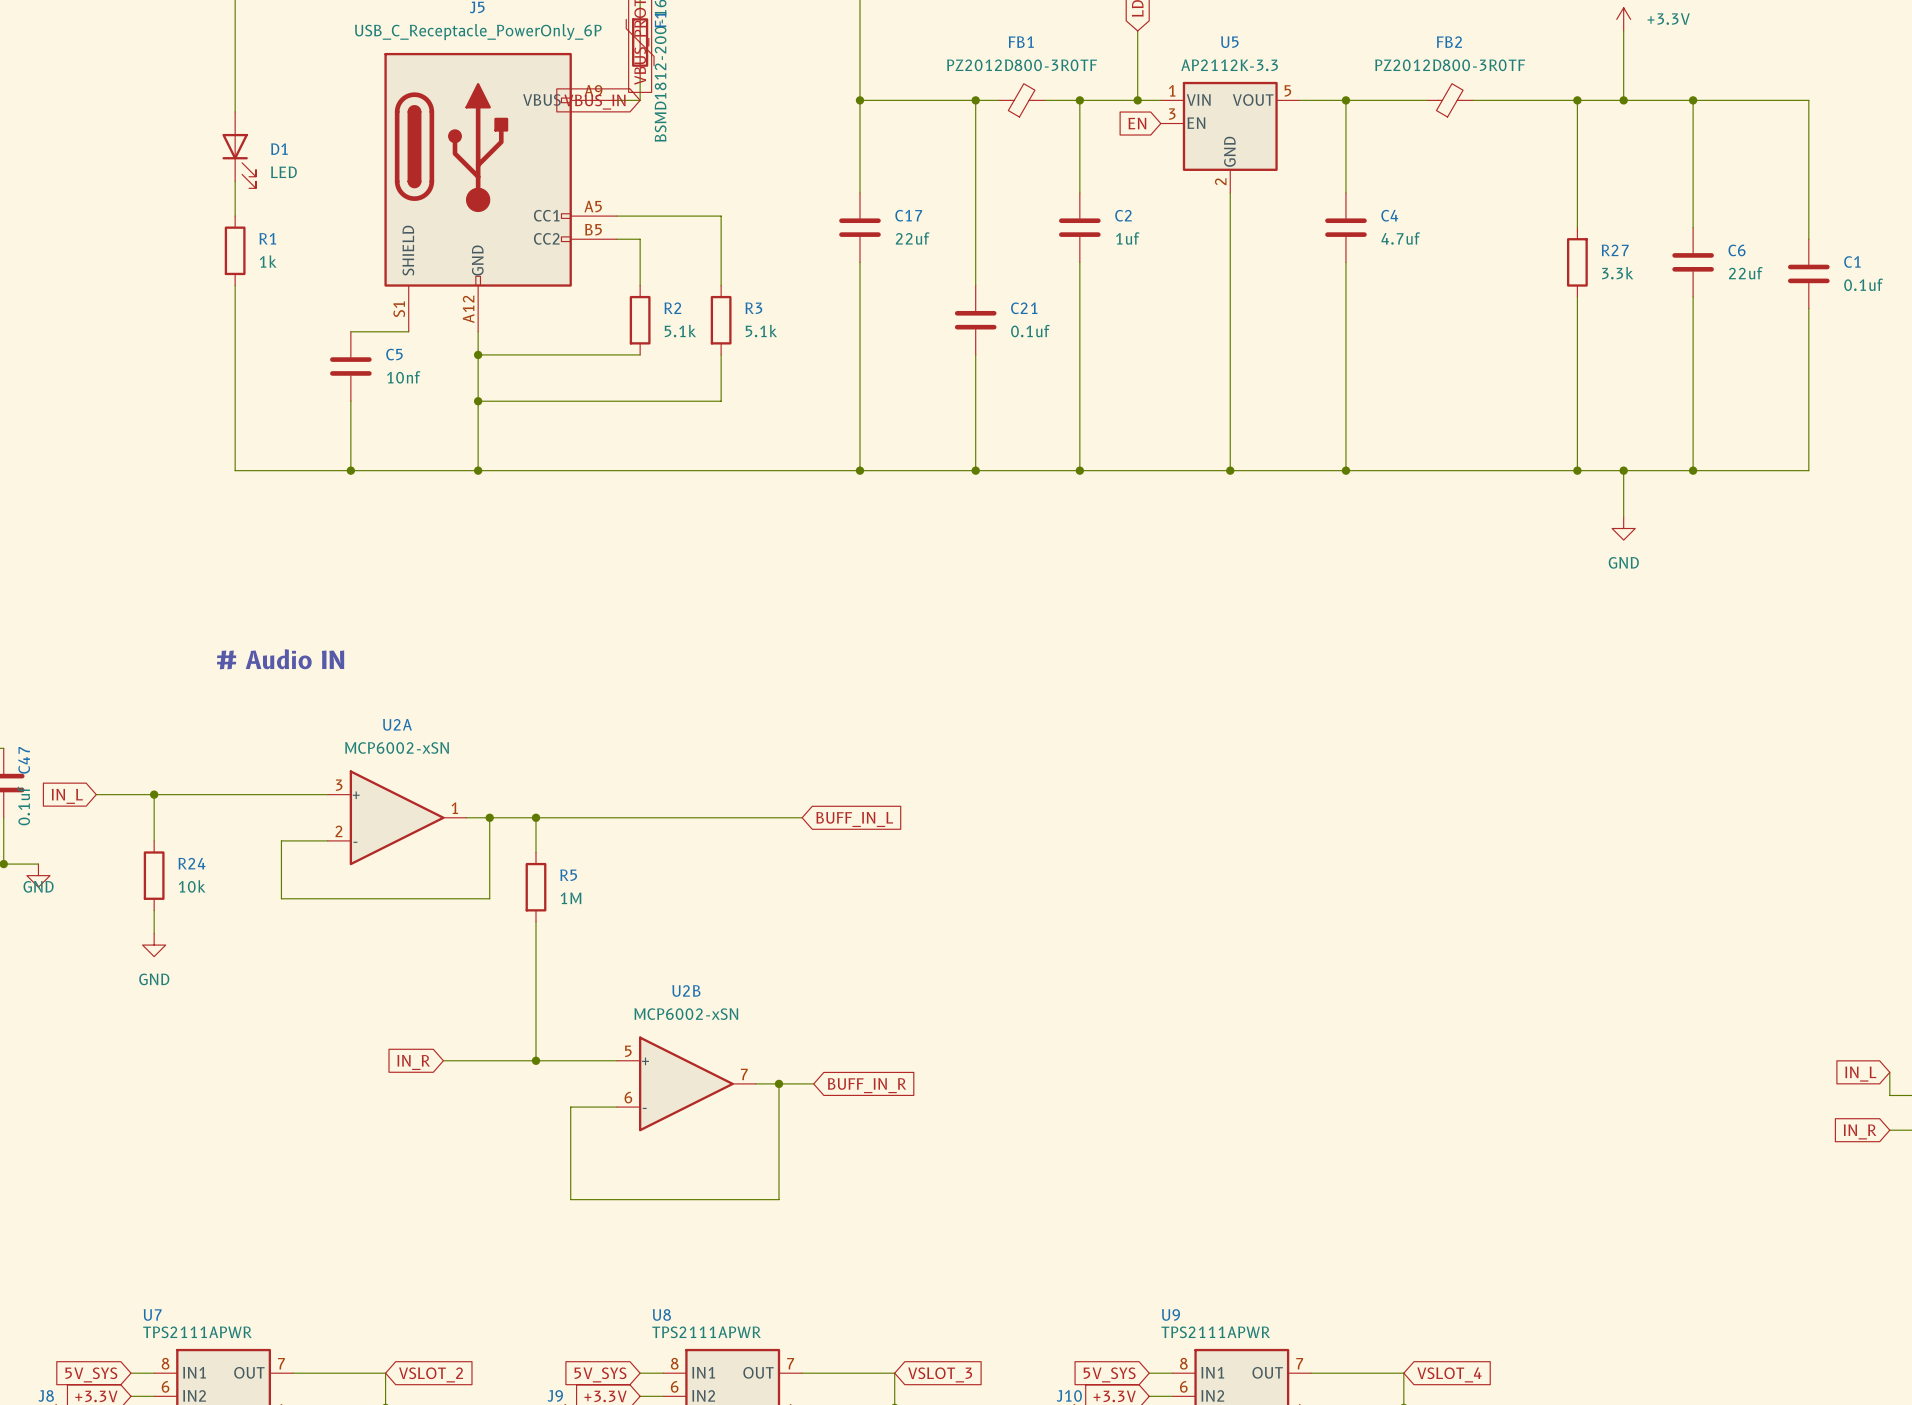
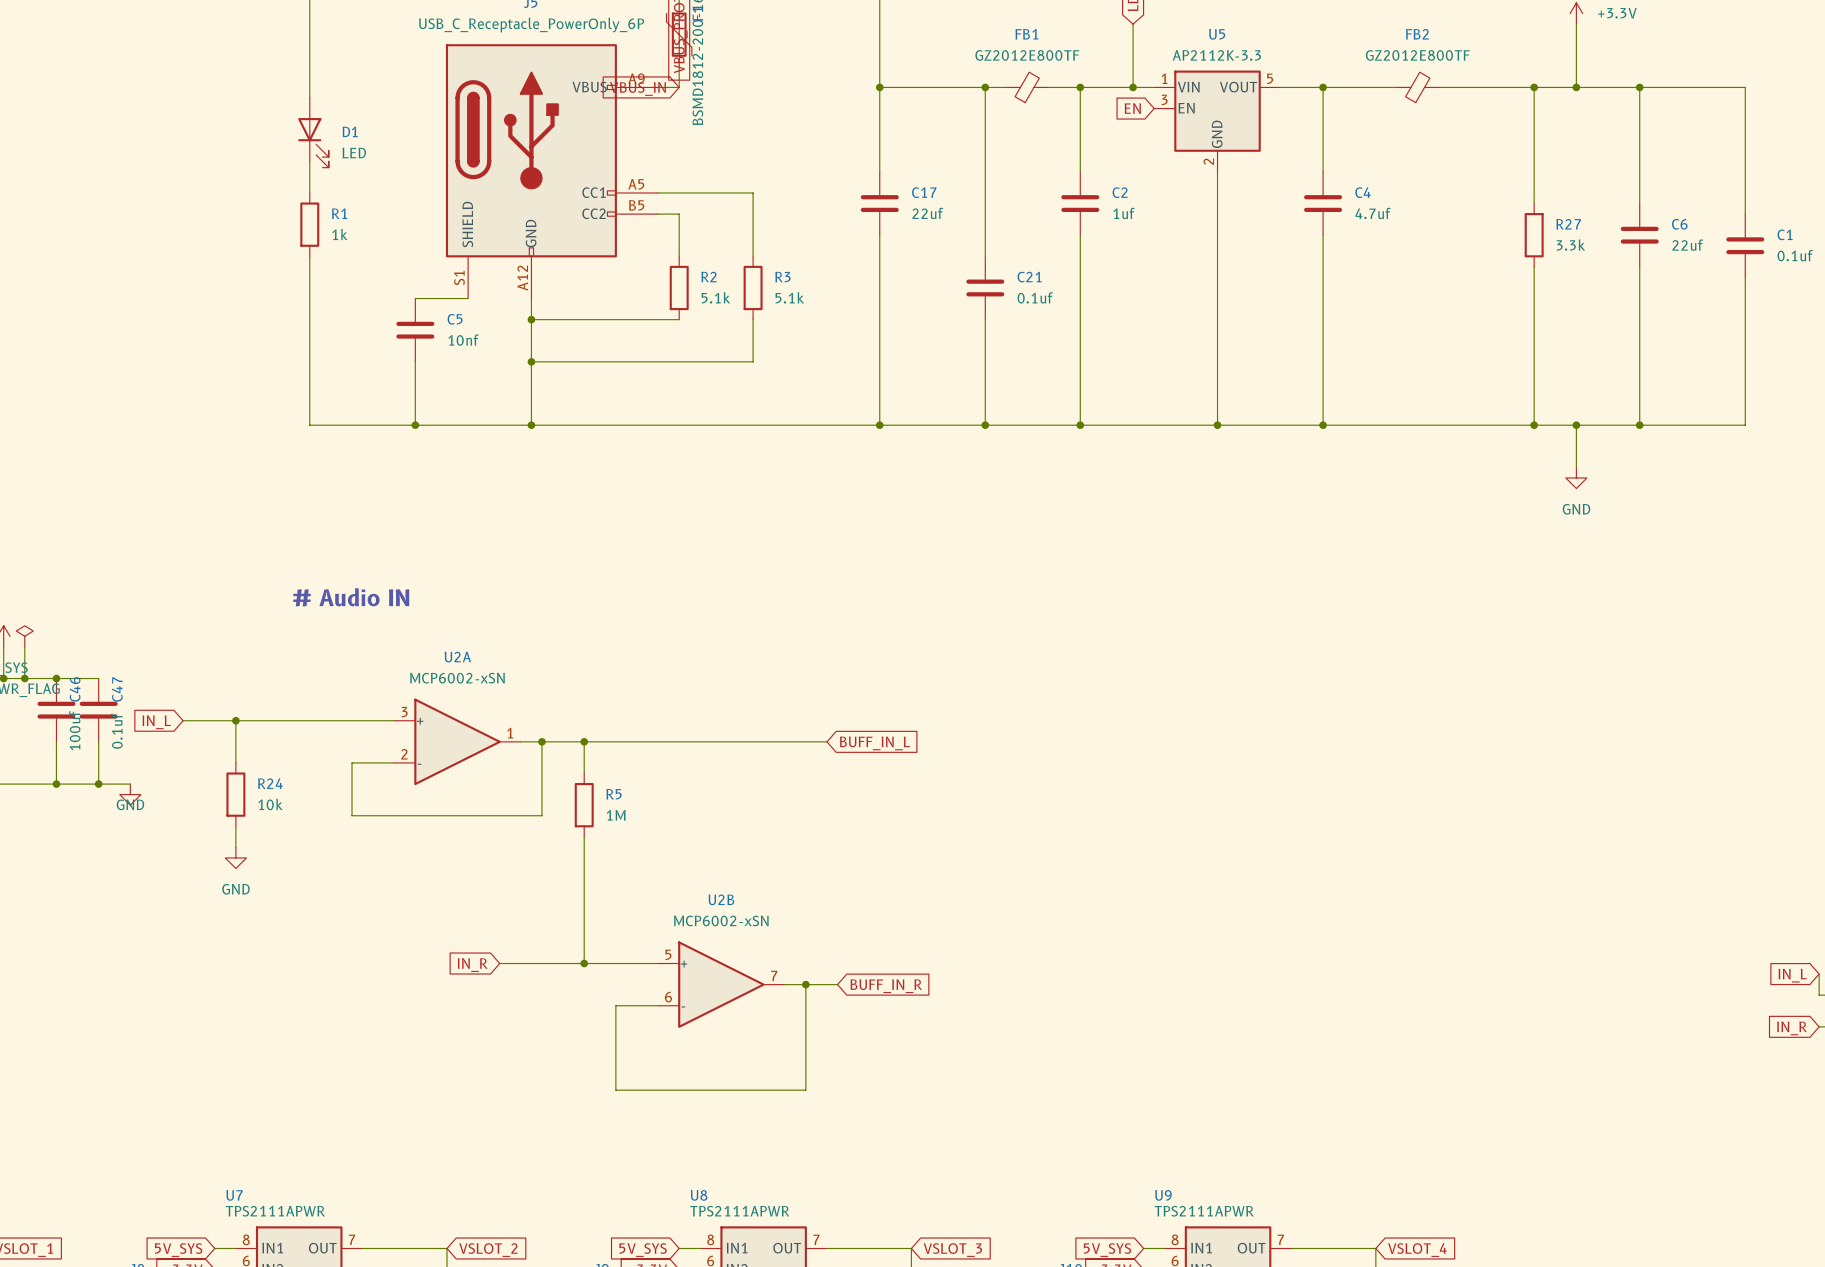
FB1 value: PZ2012D800-3R0TF (1022, 65) -> GZ2012E800TF (1027, 55)
FB2 value: PZ2012D800-3R0TF (1450, 65) -> GZ2012E800TF (1417, 55)

